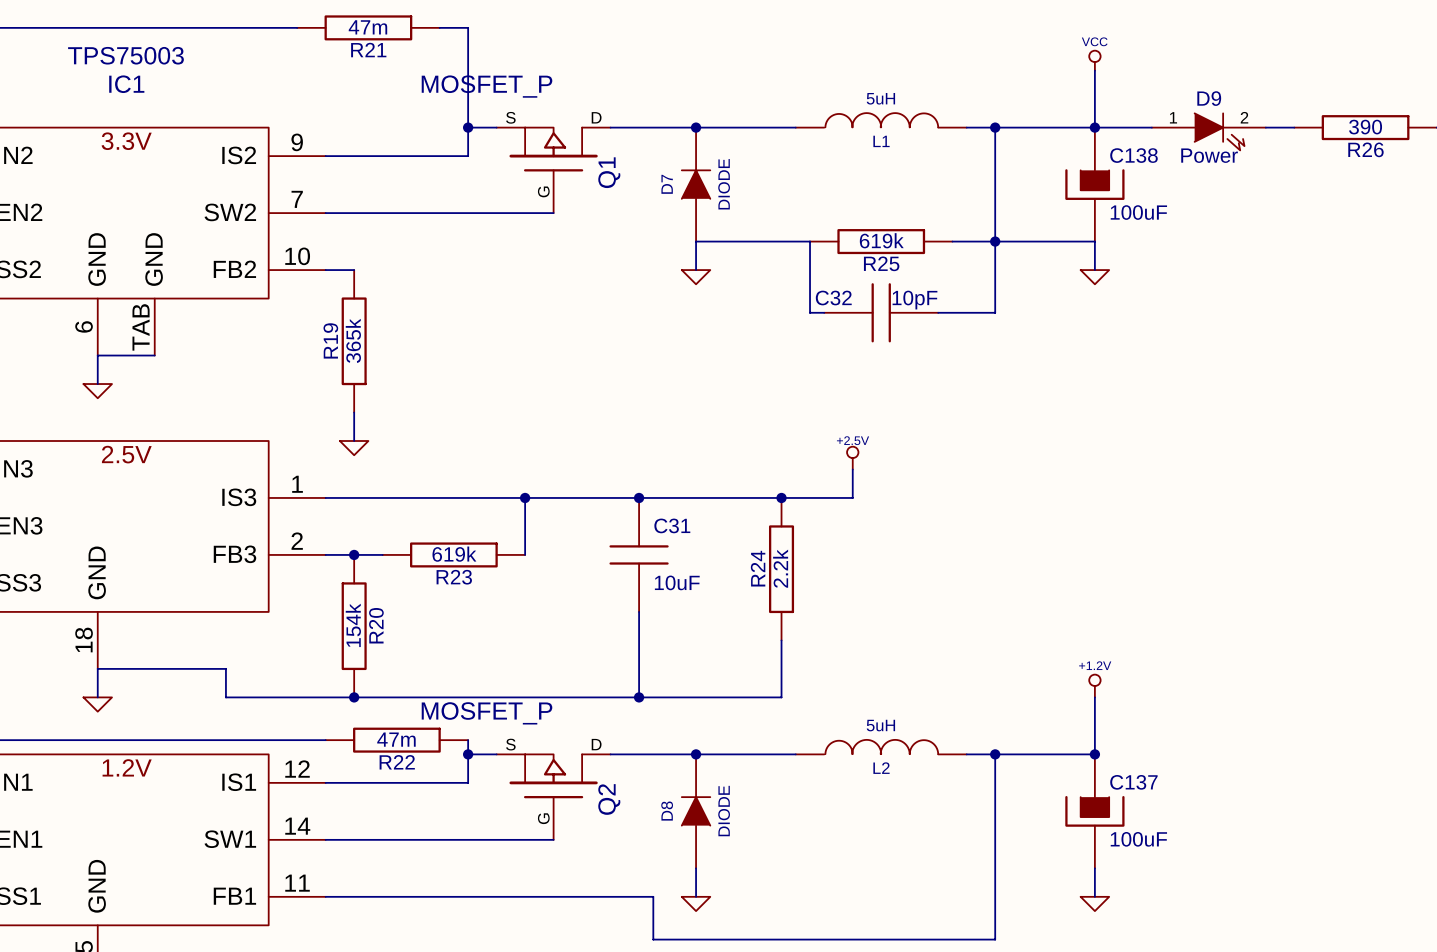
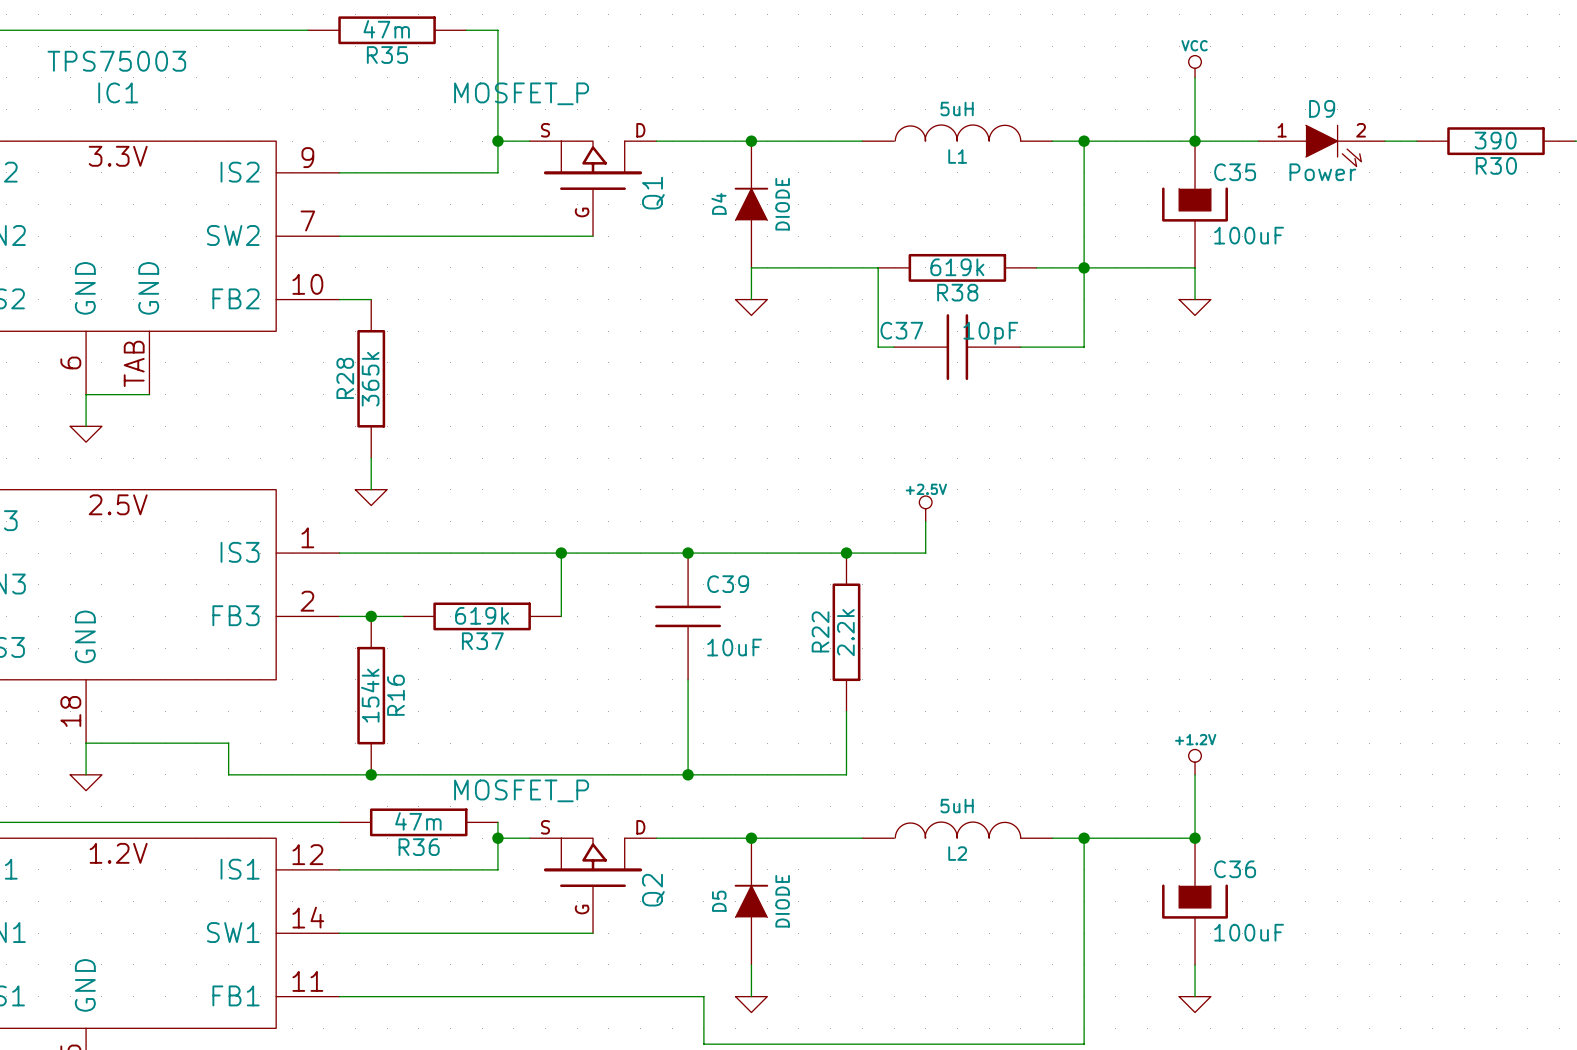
R21 name: R21 (368, 50) -> R35 (387, 55)
R26 name: R26 (1365, 149) -> R30 (1496, 165)
C138 name: C138 (1133, 155) -> C35 (1235, 172)
D7 name: D7 (667, 184) -> D4 (718, 203)
R25 name: R25 (881, 263) -> R38 (957, 292)
C32 name: C32 (833, 298) -> C37 (901, 330)
R19 name: R19 (330, 340) -> R28 (345, 378)
C31 name: C31 (672, 525) -> C39 (728, 584)
R24 name: R24 (758, 568) -> R22 (820, 631)
R23 name: R23 (454, 577) -> R37 (482, 641)
R20 name: R20 (376, 625) -> R16 (395, 695)
R22 name: R22 (397, 762) -> R36 (419, 847)
C137 name: C137 (1133, 782) -> C36 (1235, 869)
D8 name: D8 (667, 811) -> D5 (719, 901)

